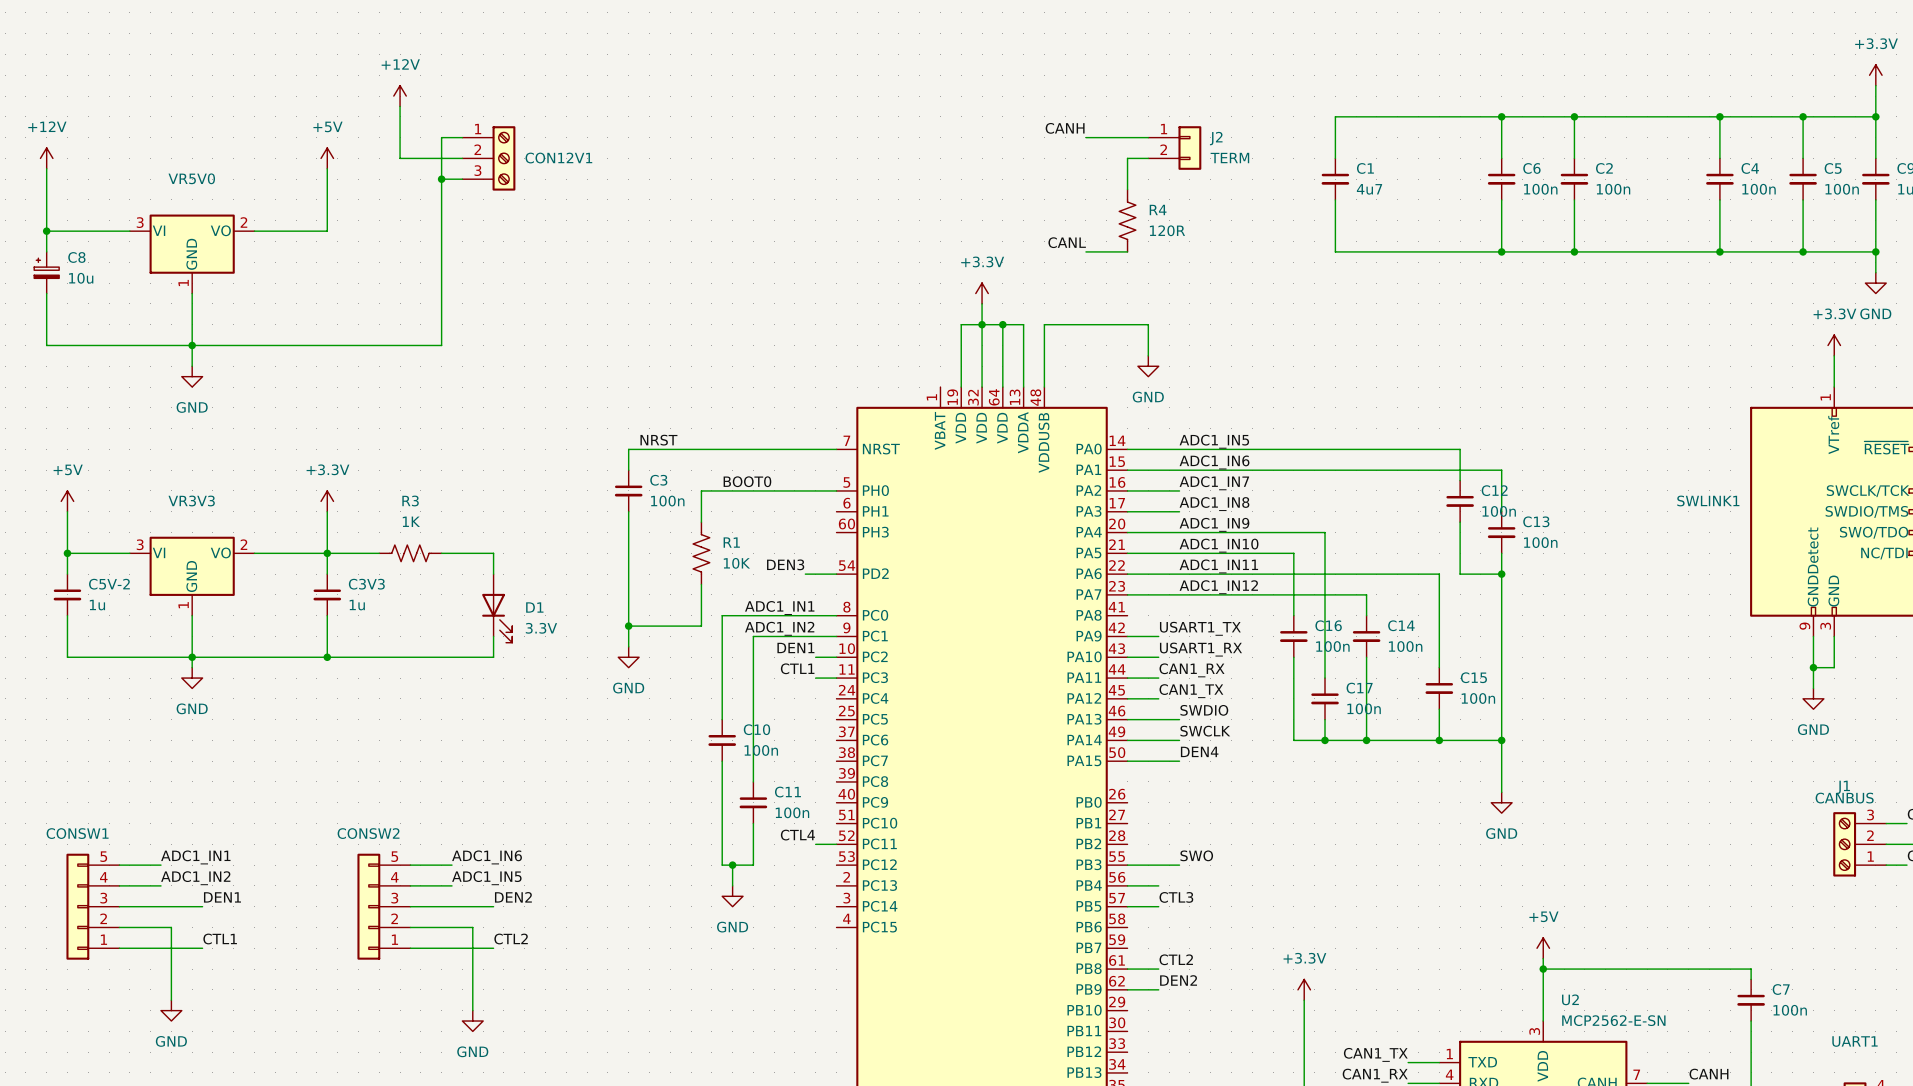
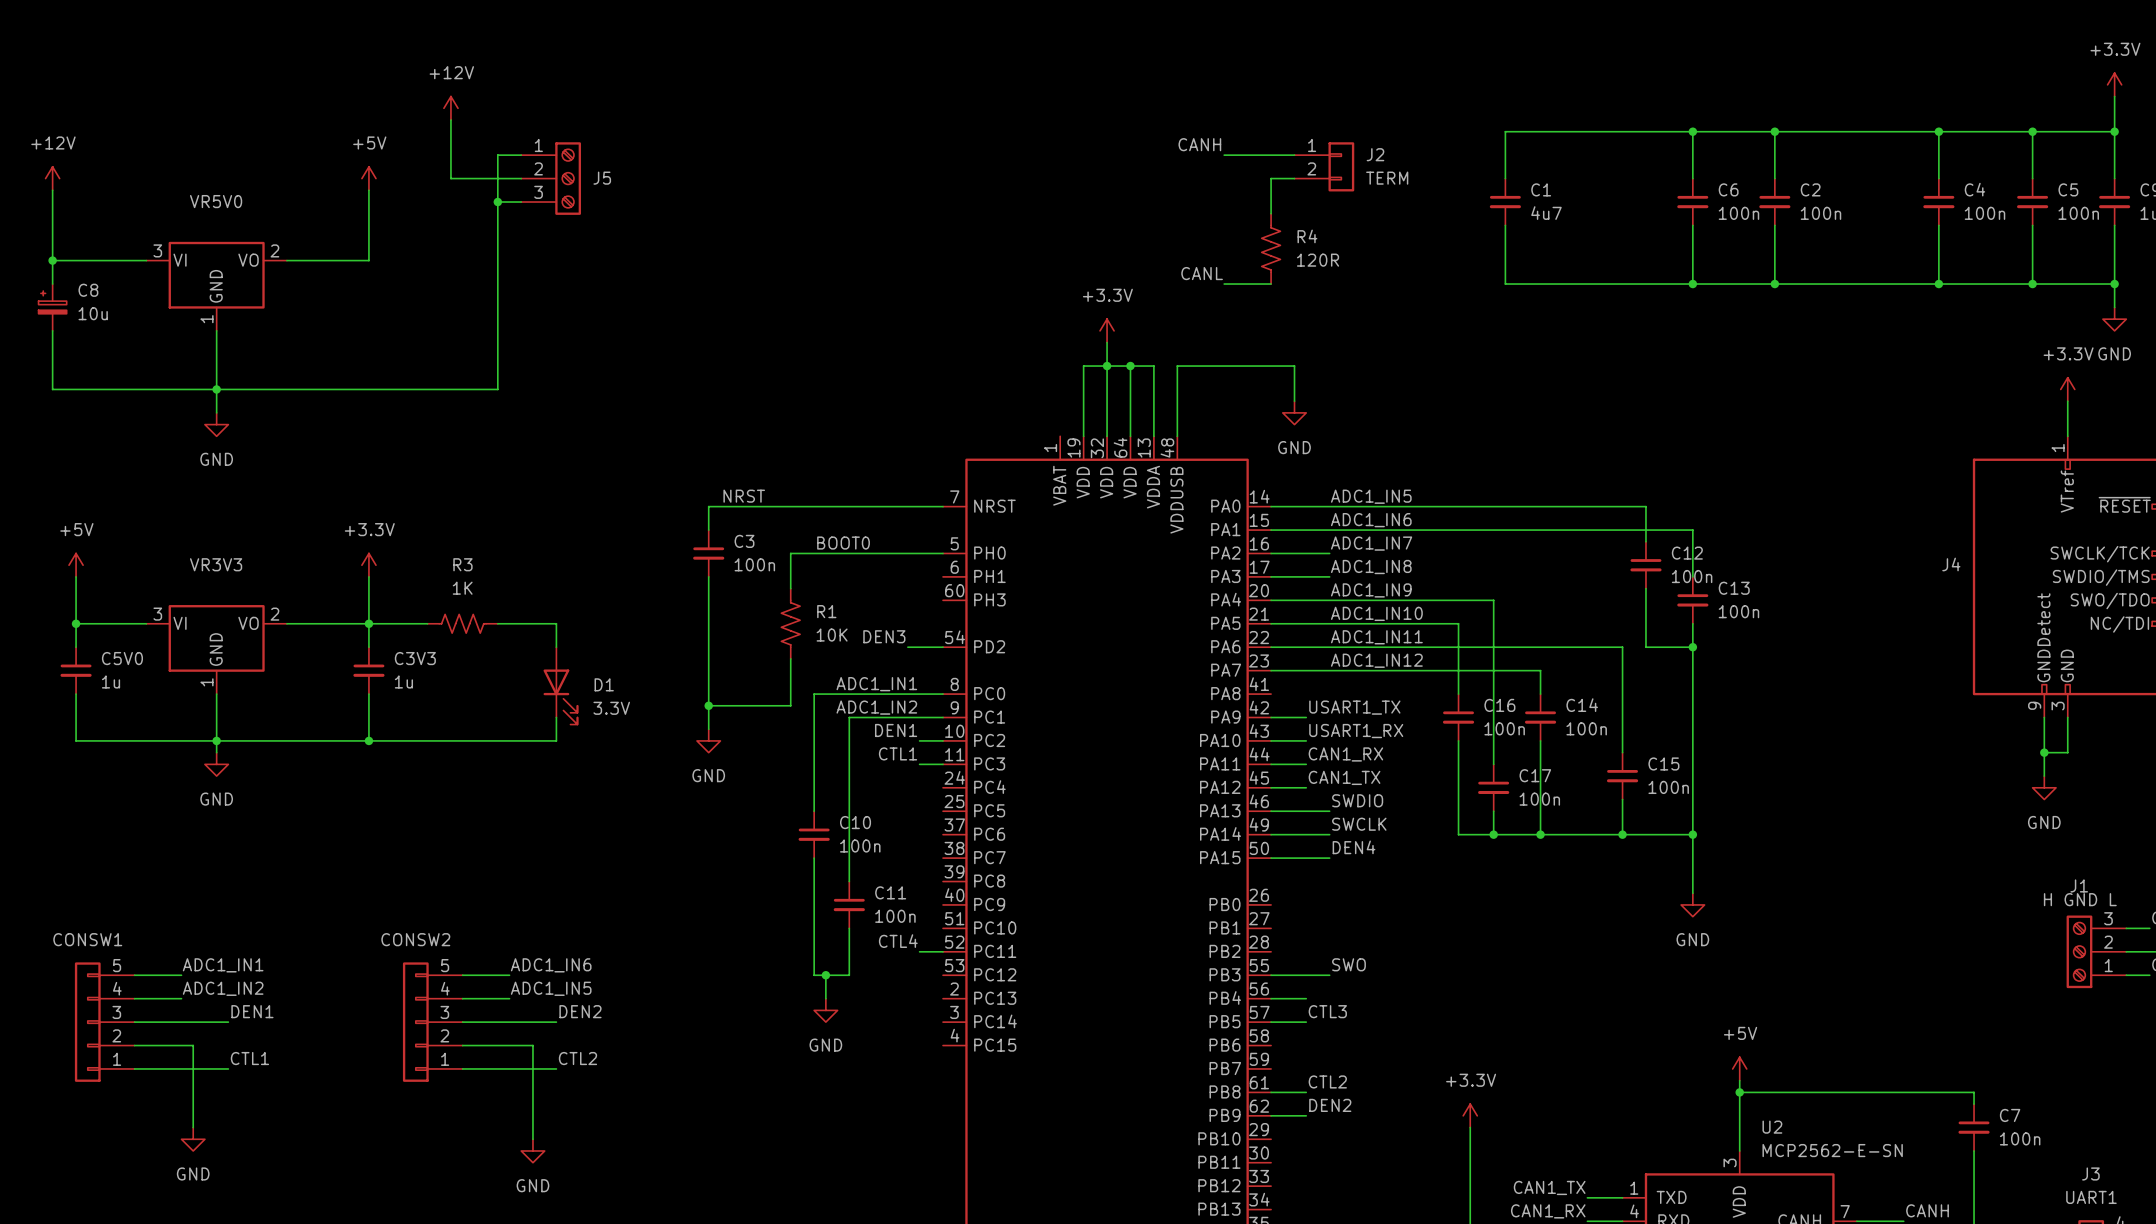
CON12V1 name: CON12V1 (558, 158) -> J5 (602, 178)
SWLINK1 name: SWLINK1 (1708, 500) -> J4 (1951, 564)
C5V-2 name: C5V-2 (109, 584) -> C5V0 (122, 658)
J1 value: CANBUS (1844, 798) -> H GND L (2080, 899)
UART1 name: UART1 (1855, 1041) -> J3 (2090, 1173)
UART1 value: none -> UART1 (2091, 1197)

